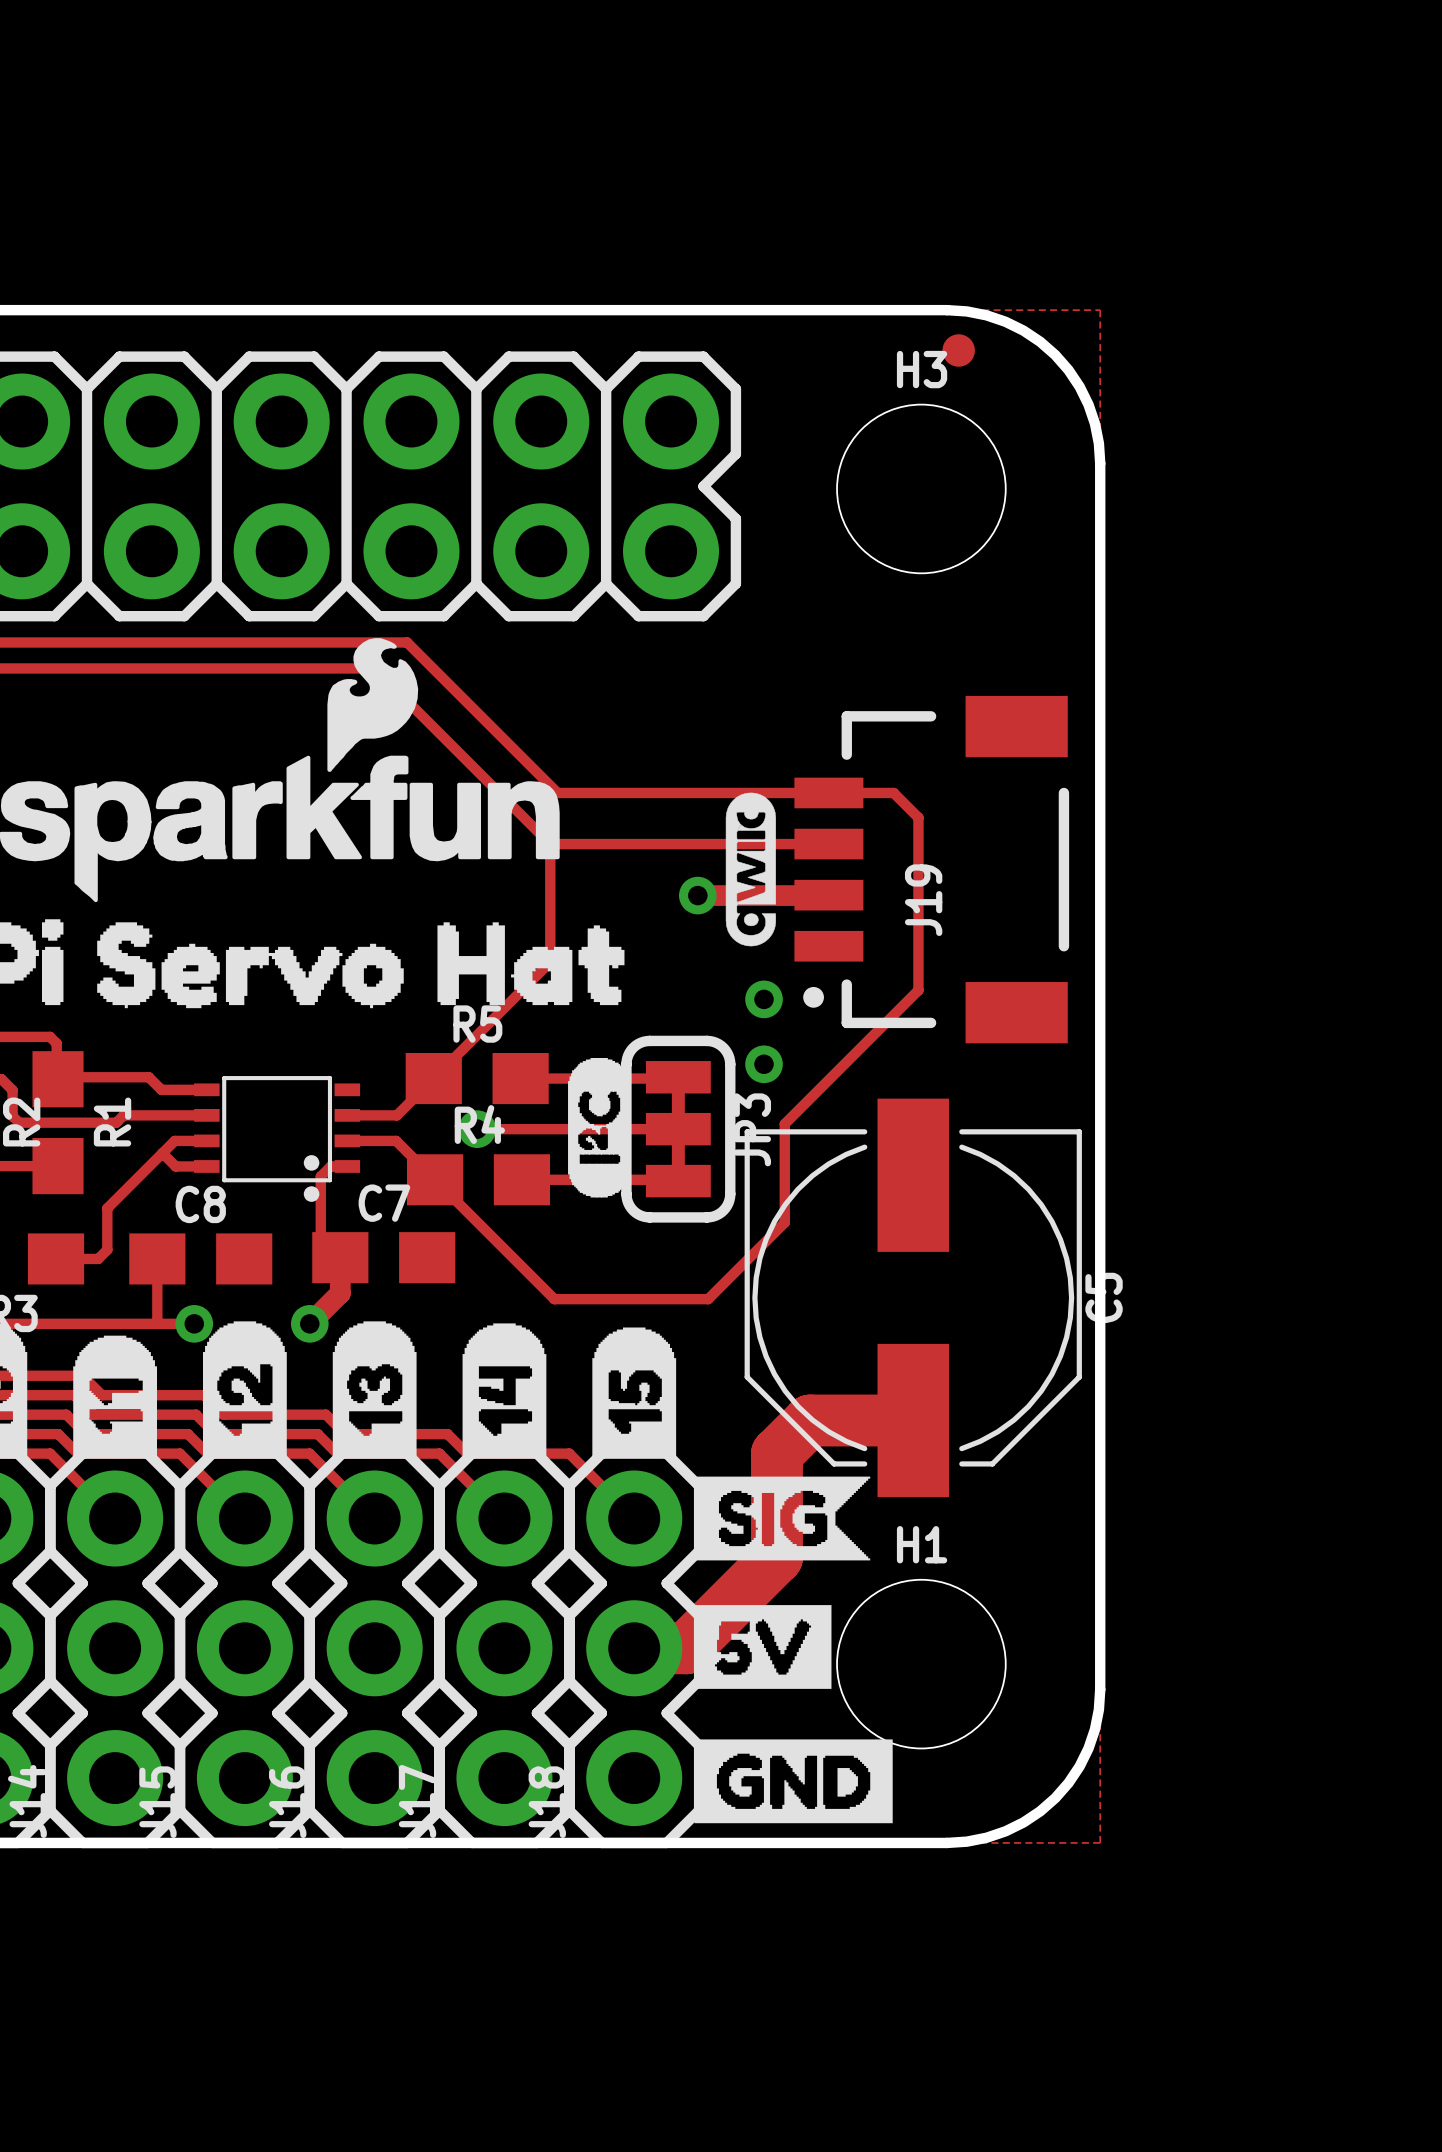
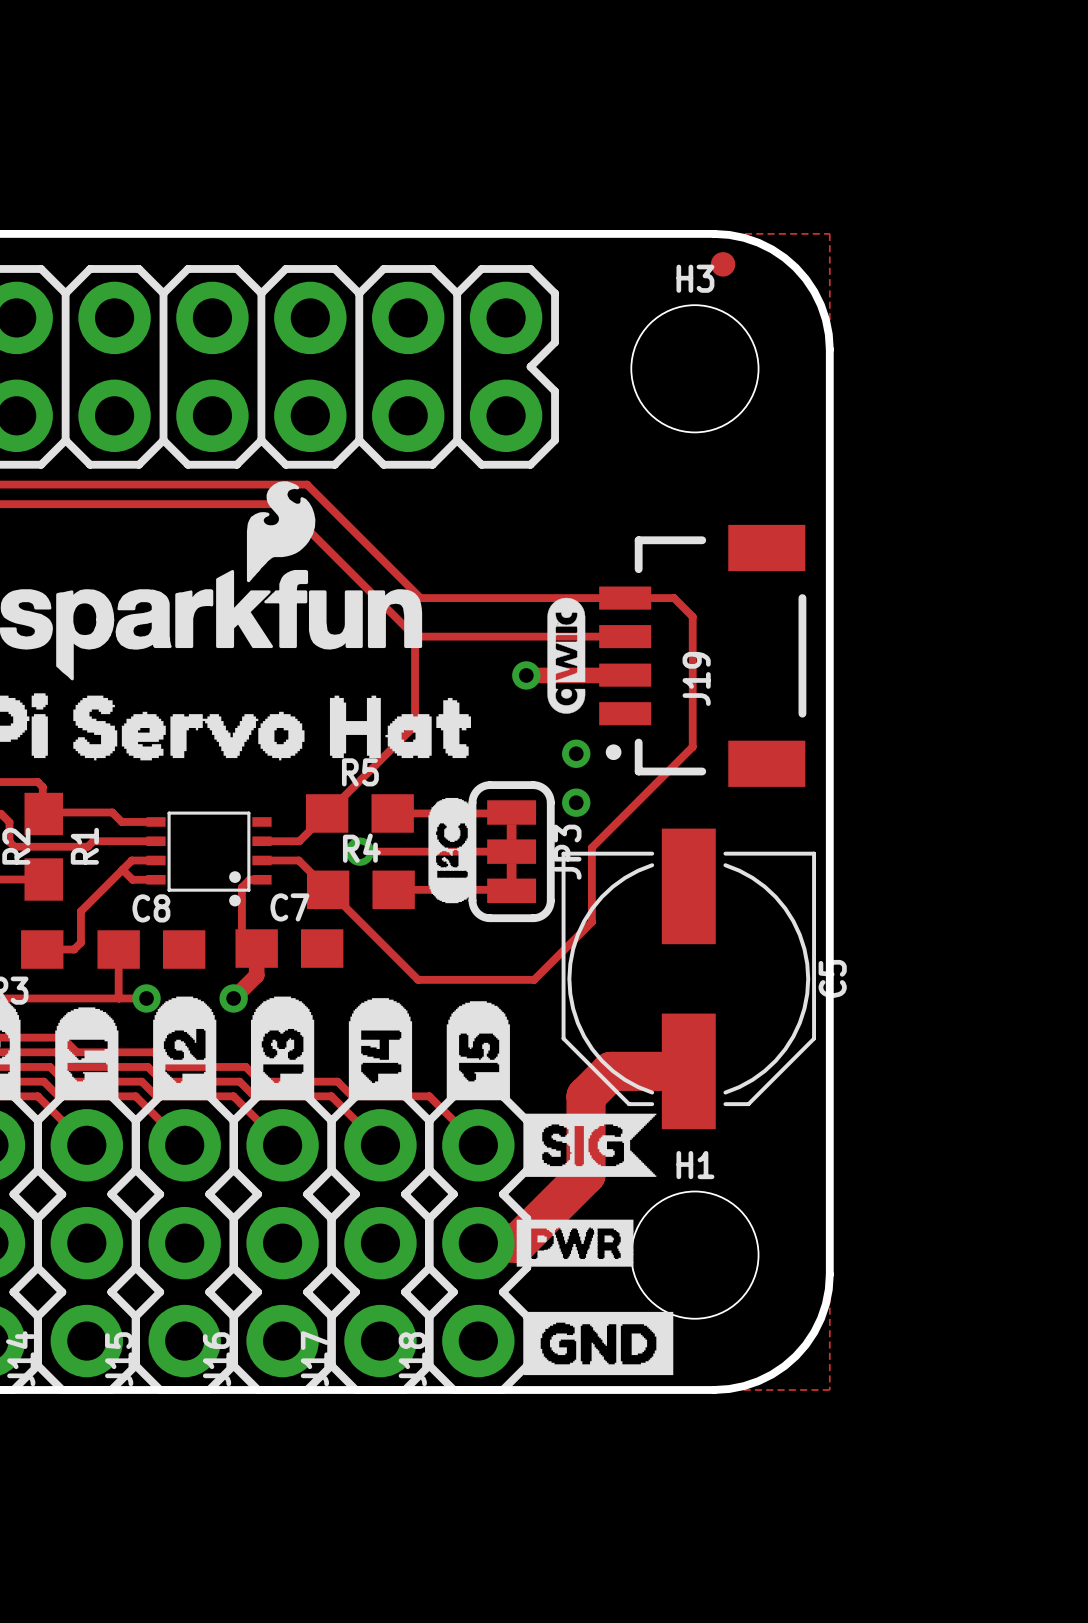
drawing shape: [694, 1605, 832, 1689] -> [516, 1219, 634, 1267]

